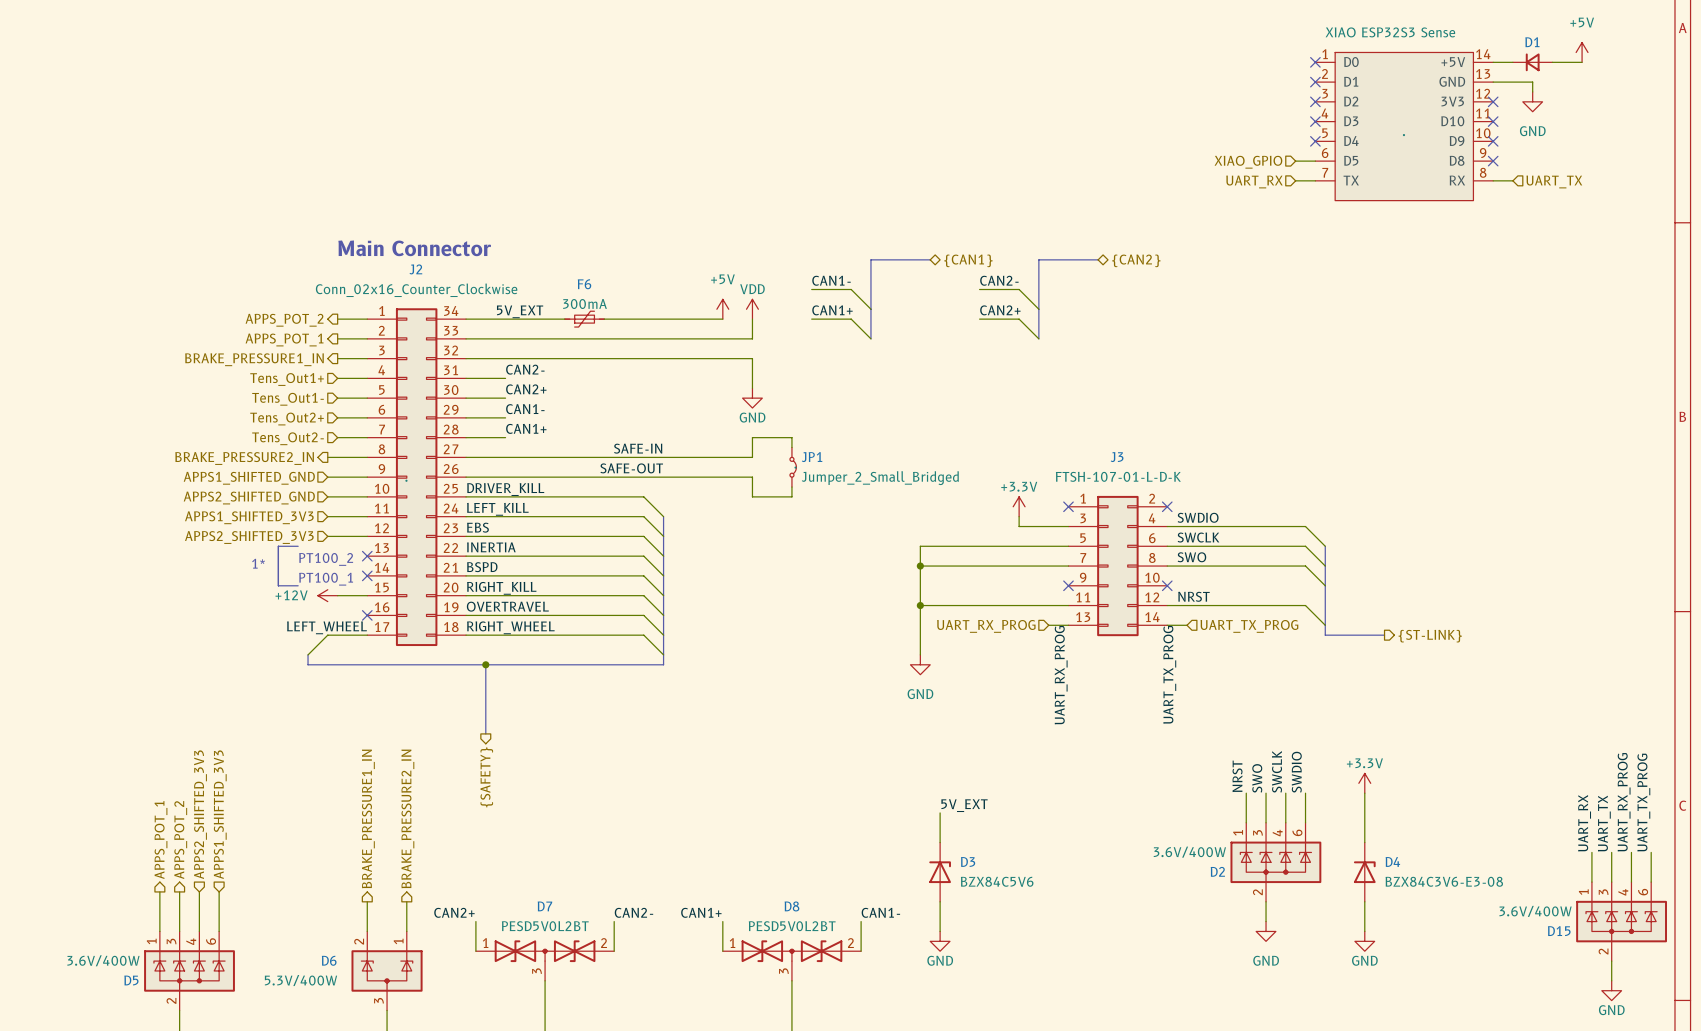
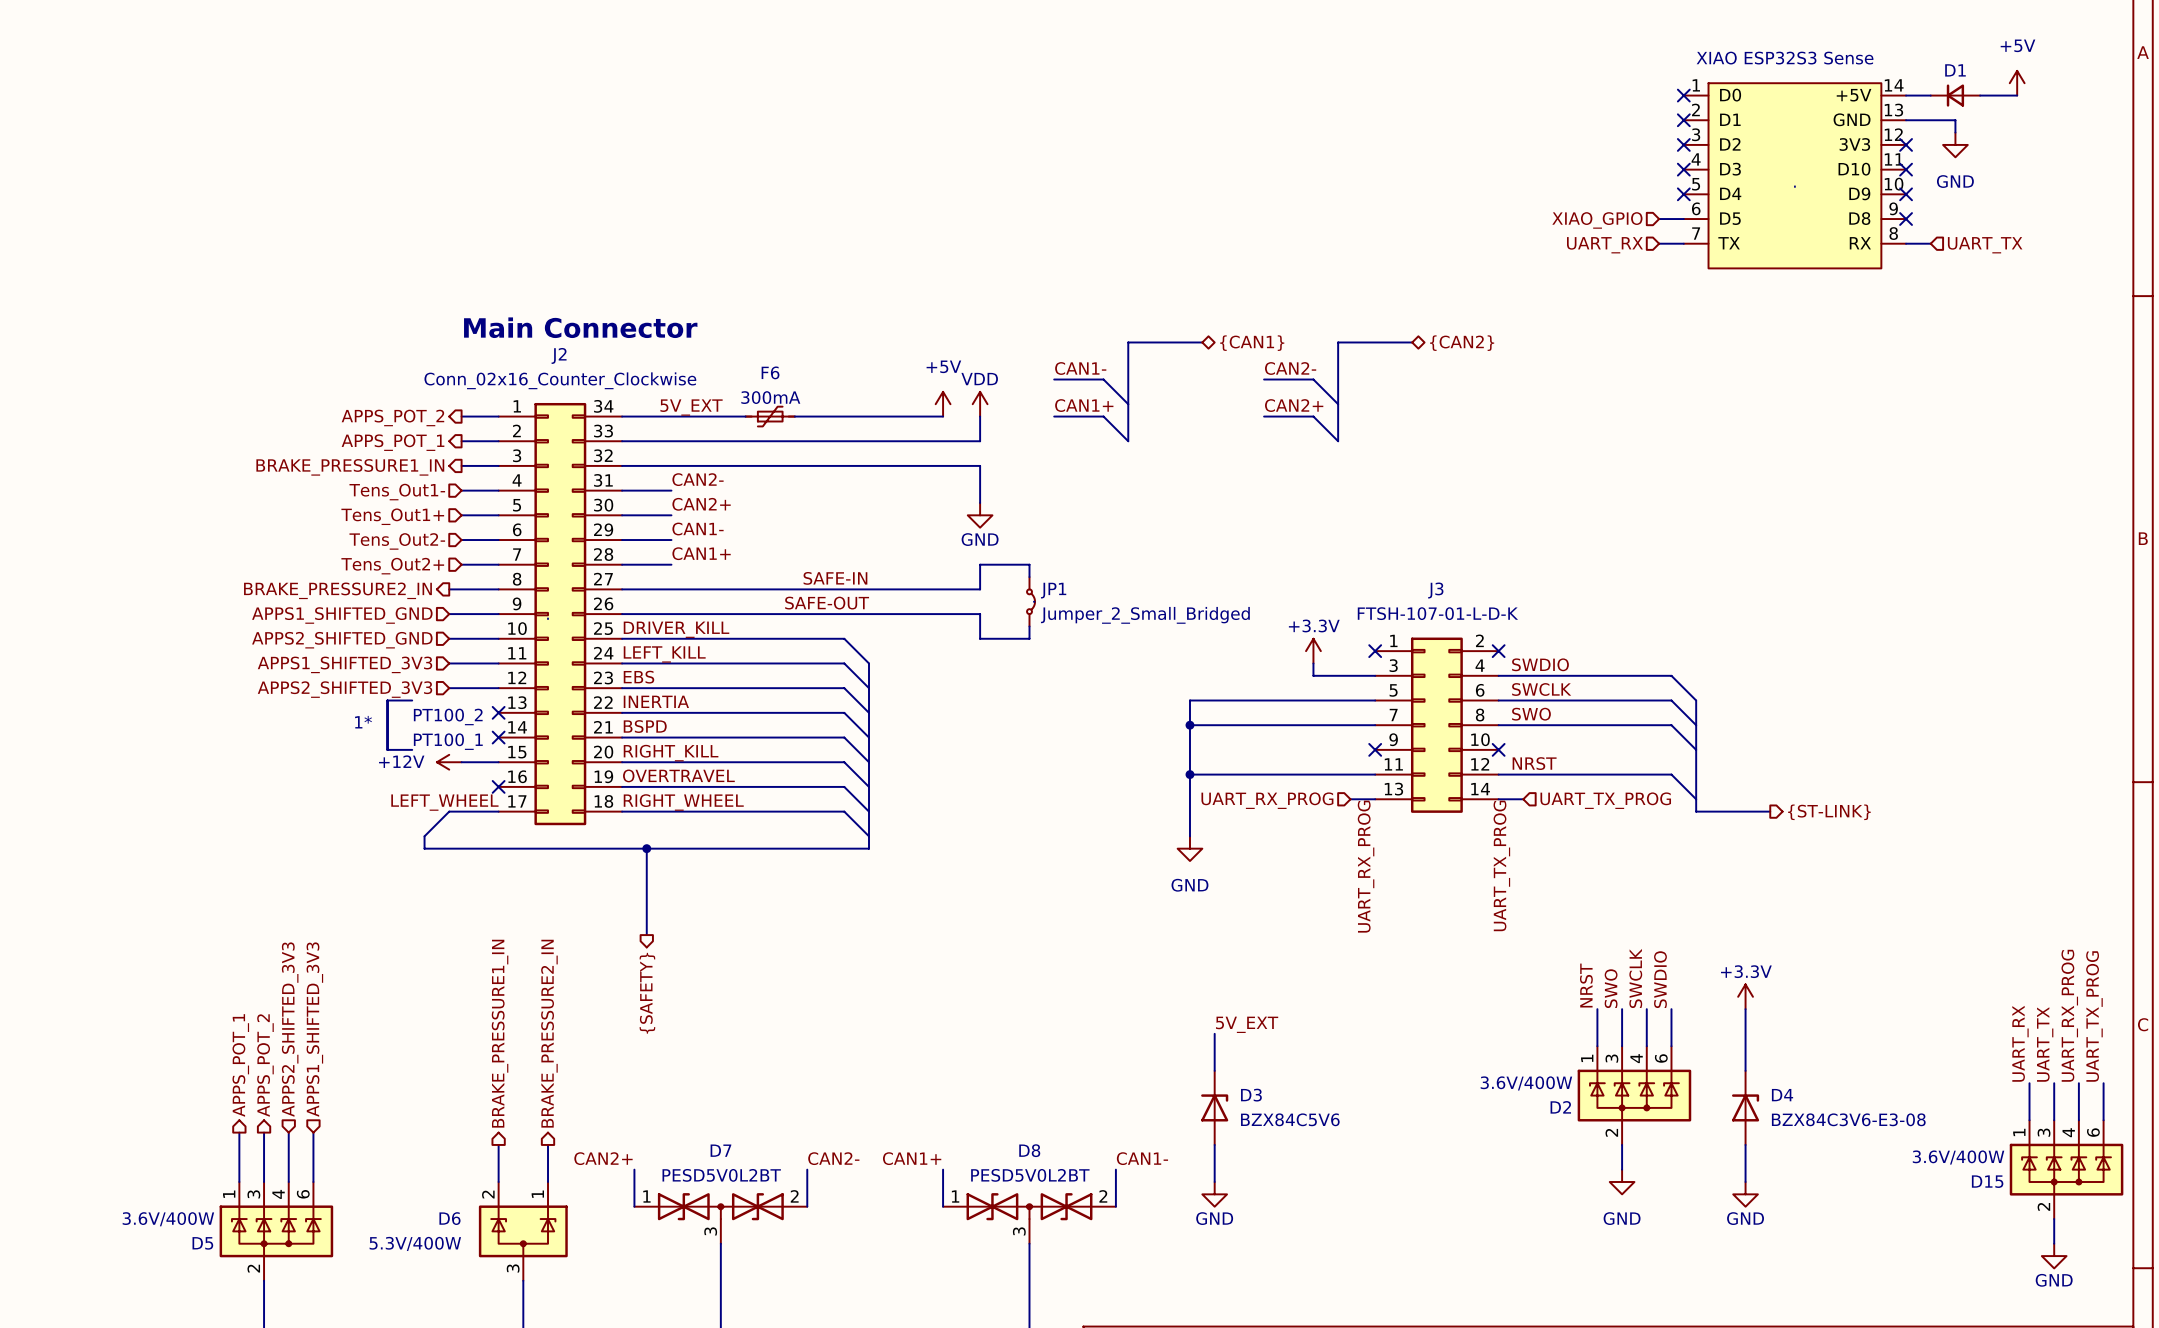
hierarchical label: Tens_Out1+ (287, 379) -> Tens_Out1- (397, 492)
hierarchical label: Tens_Out1- (288, 399) -> Tens_Out1+ (392, 516)
hierarchical label: Tens_Out2+ (287, 419) -> Tens_Out2- (397, 541)
hierarchical label: Tens_Out2- (288, 438) -> Tens_Out2+ (392, 566)

